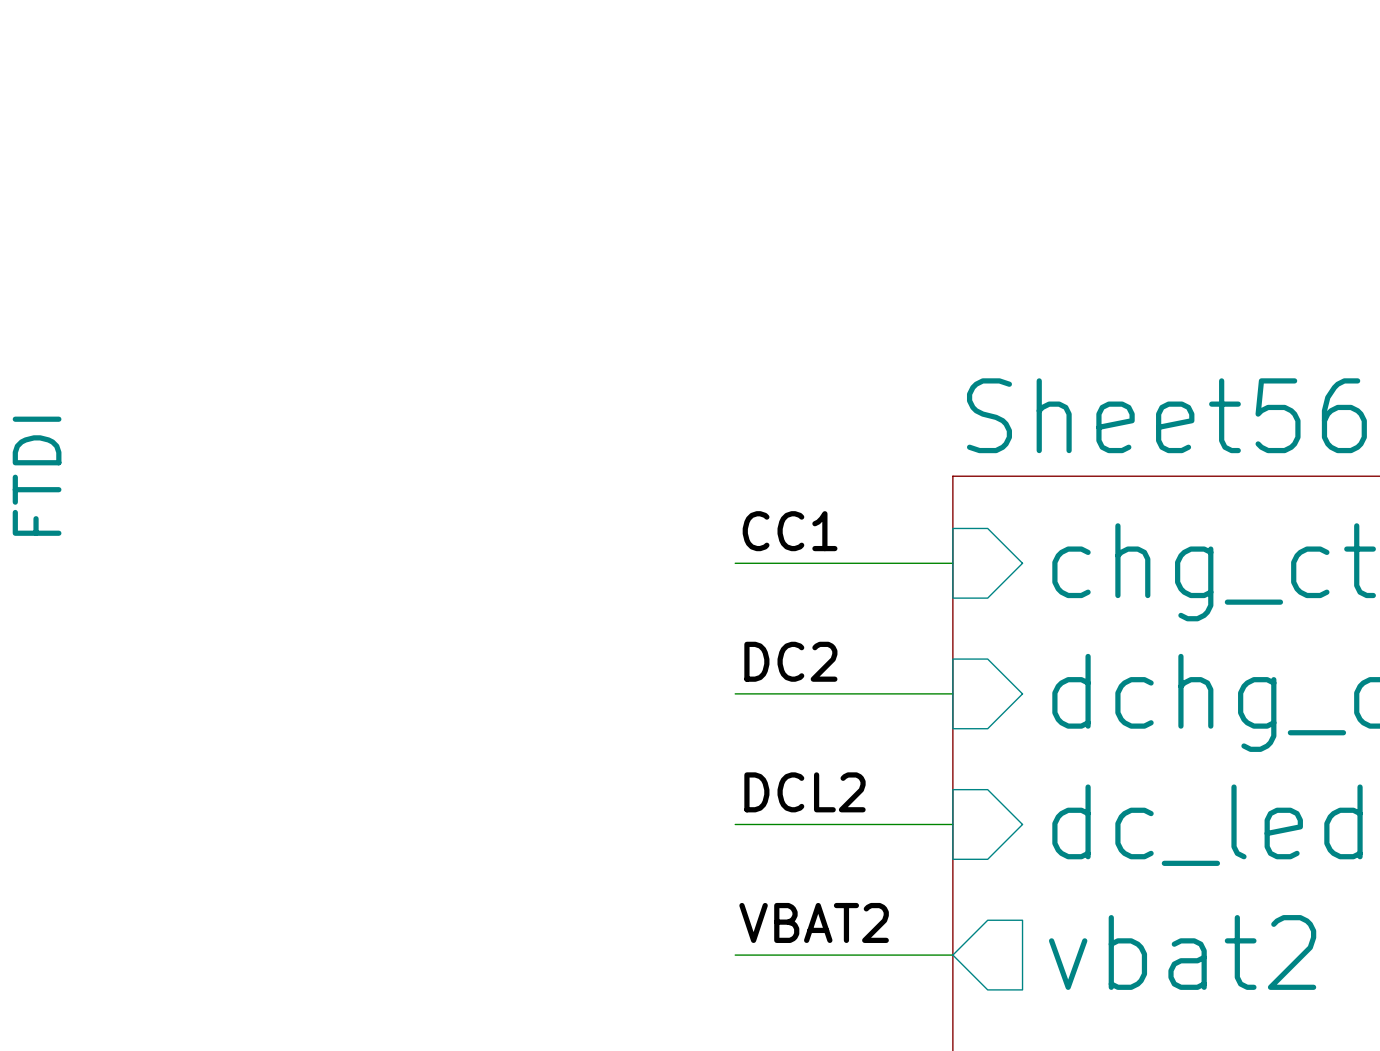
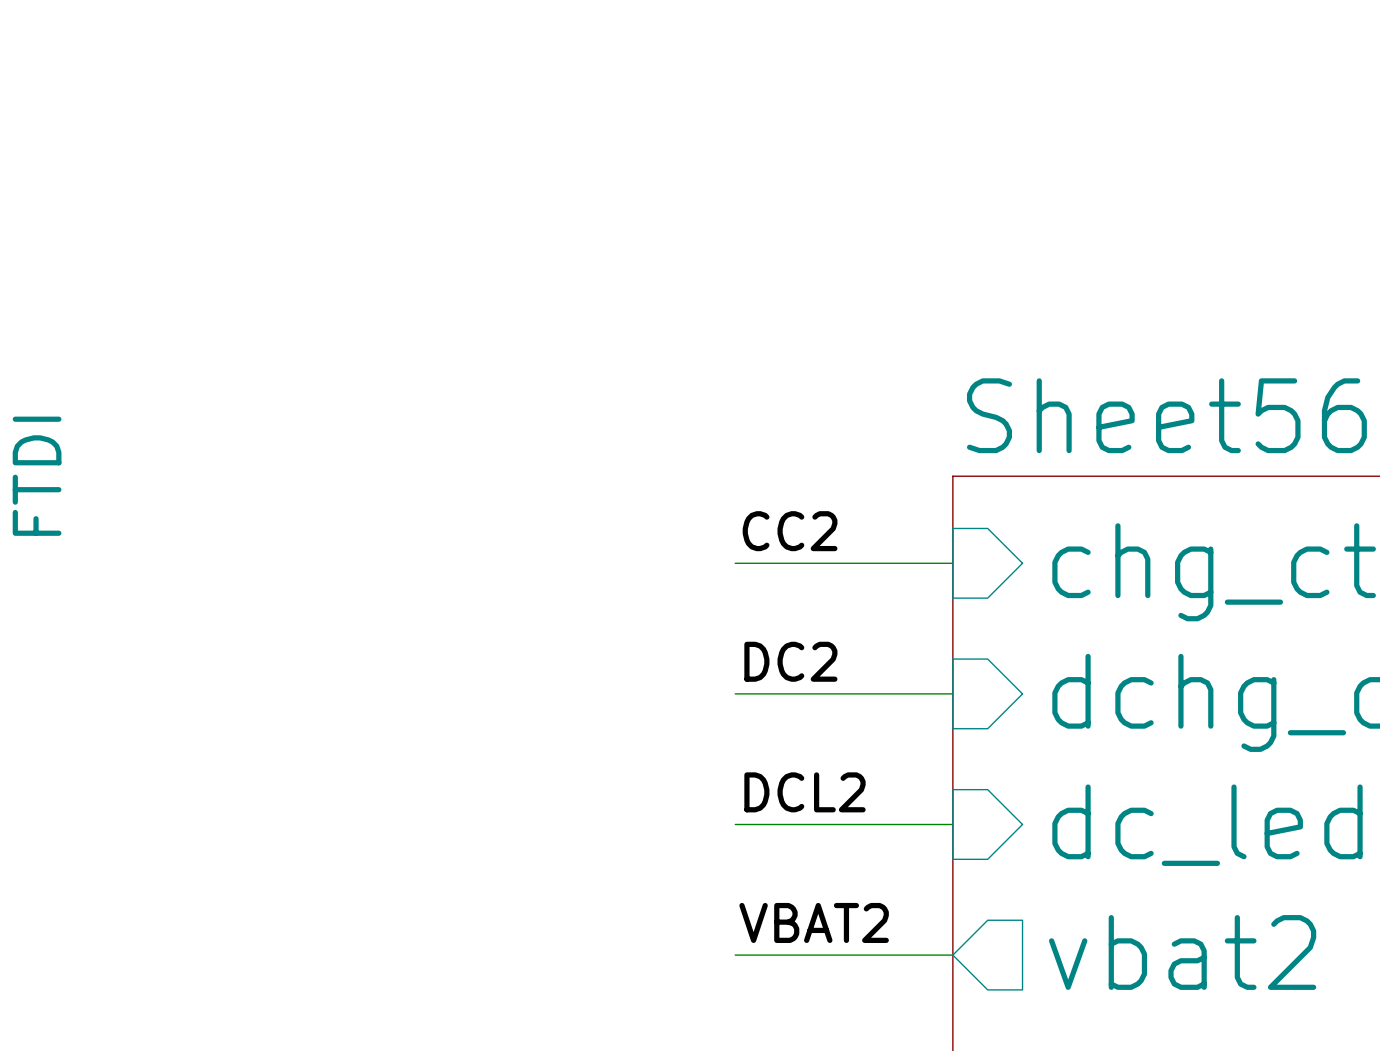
label: CC1 (790, 531) -> CC2 (790, 531)

